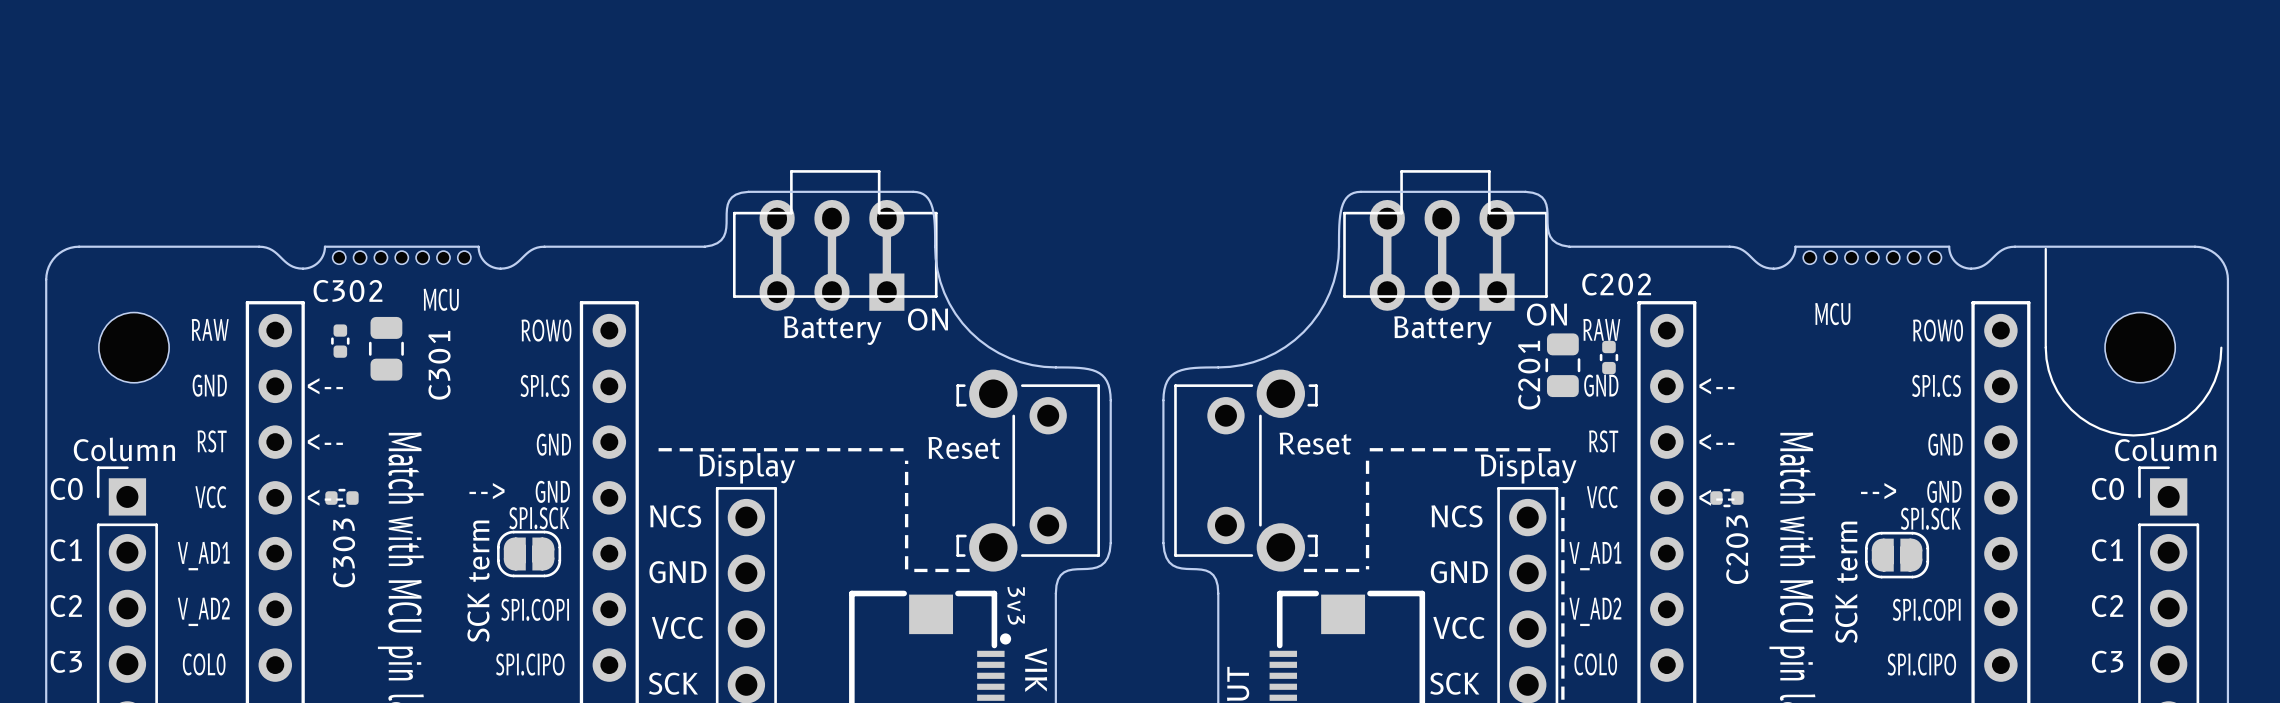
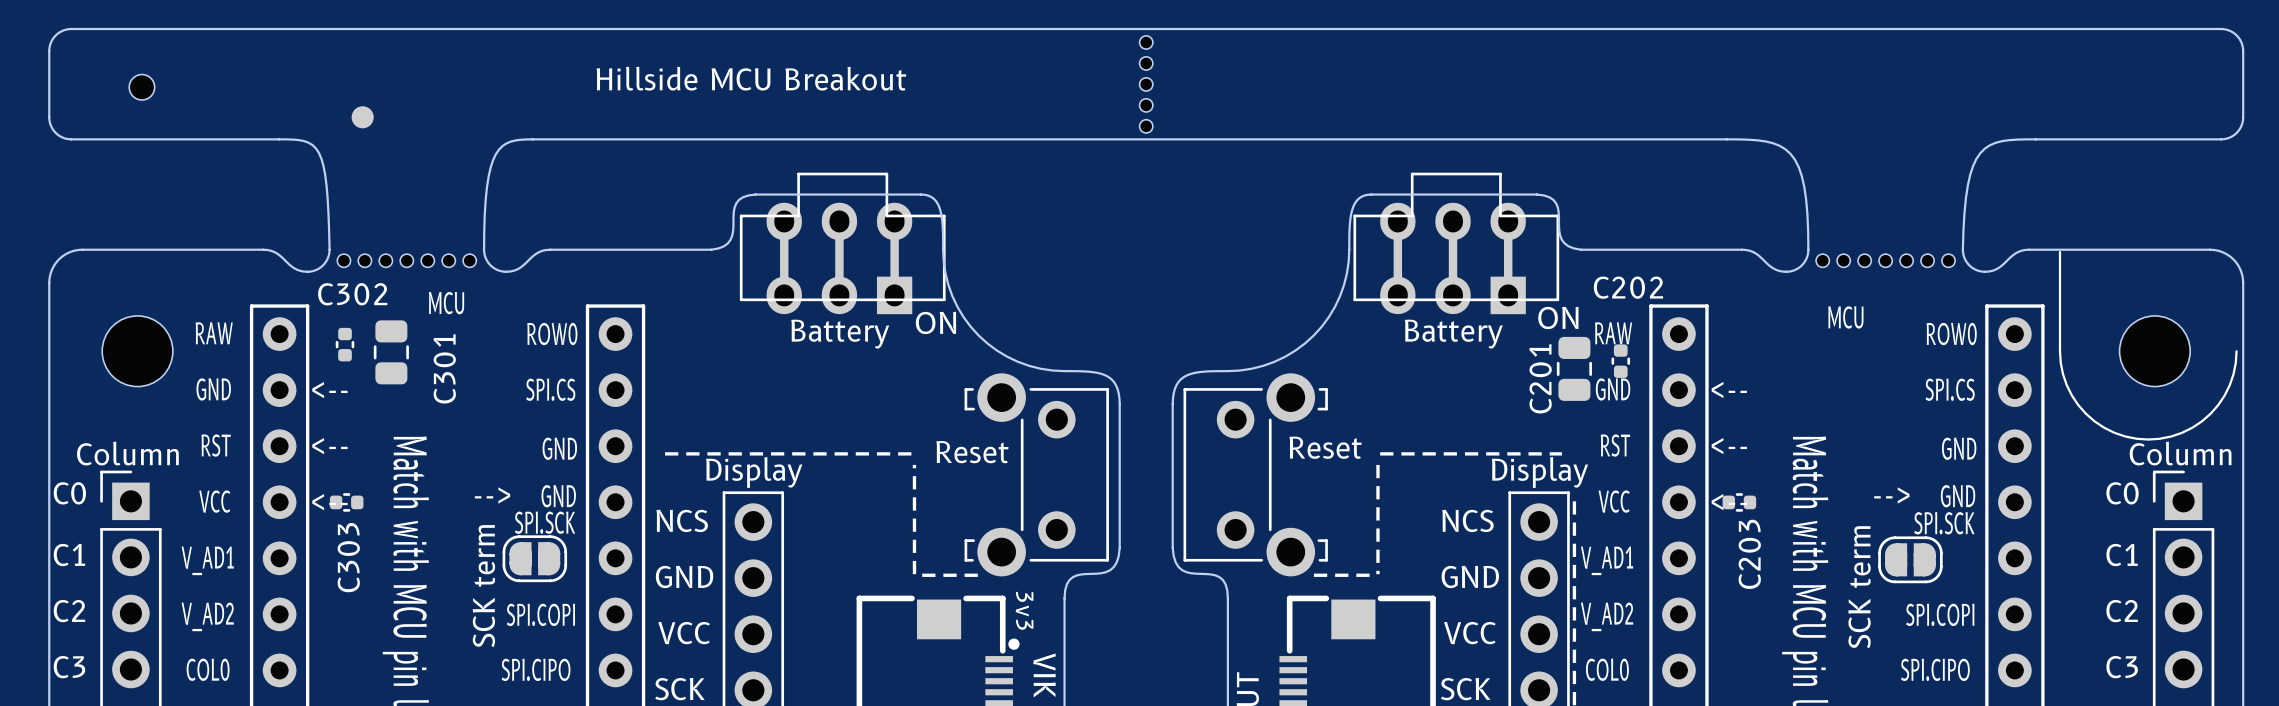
text: none -> Hillside MCU Breakout (751, 78)
part: none -> (1146, 84)
part: none -> (141, 87)
part: none -> (362, 117)
board edge: (324, 246) (478, 246) -> (329, 249) (327, 198) (323, 166) (319, 153) (308, 142) (286, 139) (71, 139) (57, 134) (51, 126) (49, 117) (49, 48) (54, 37) (61, 31) (71, 29) (2221, 29) (2230, 31) (2238, 37) (2243, 48) (2243, 117) (2240, 126) (2234, 134) (2221, 139) (2026, 139) (1995, 142) (1980, 153) (1970, 175) (1965, 198) (1962, 249)
board edge: (1795, 246) (1949, 246) -> (1808, 249) (1804, 186) (1795, 160) (1785, 149) (1773, 143) (1757, 140) (1726, 139) (521, 139) (502, 145) (493, 160) (485, 199) (484, 249)

